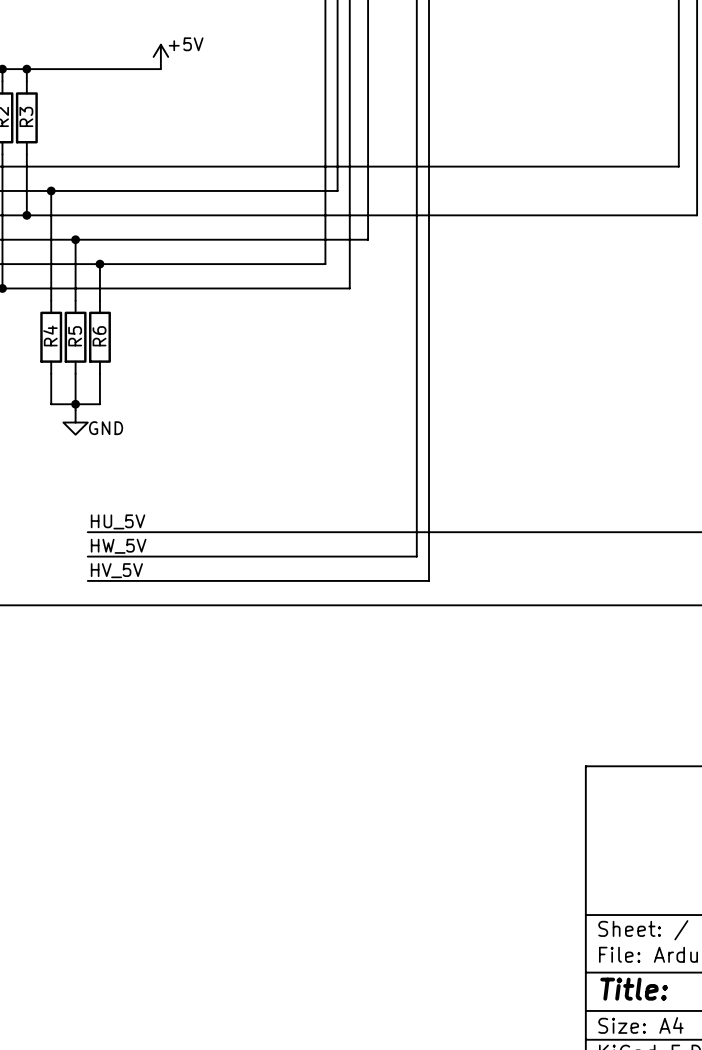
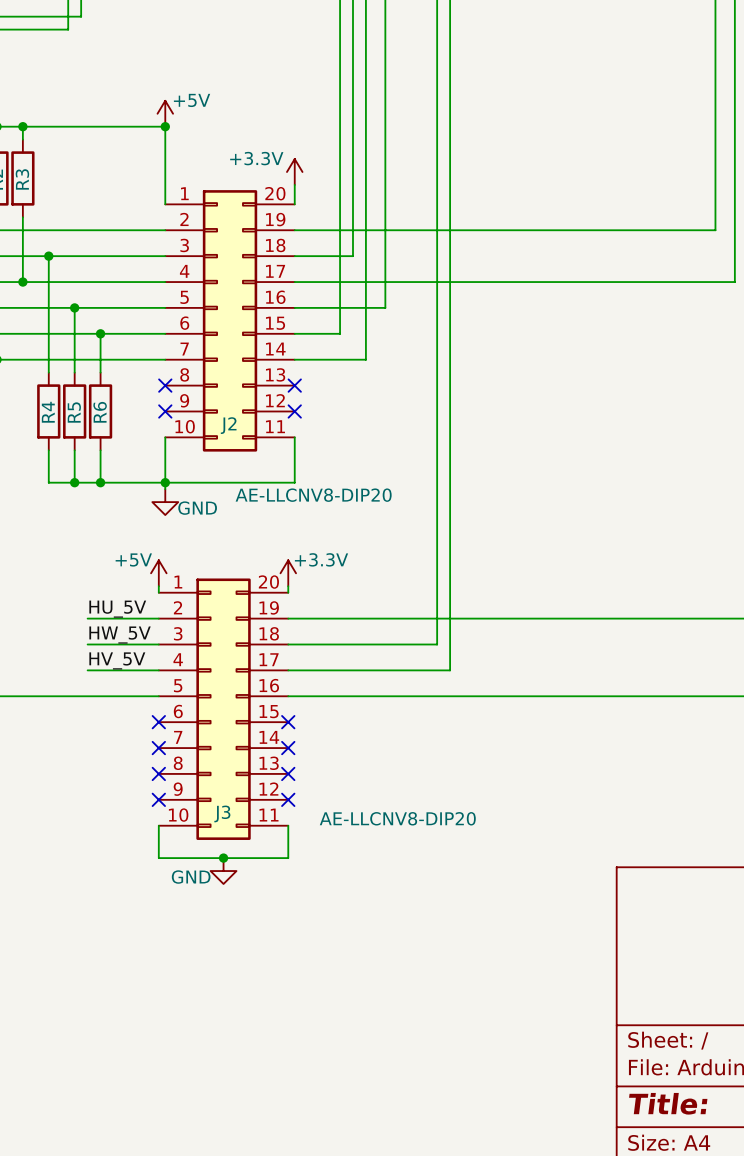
wire: none -> (165, 126) (165, 204)
junction: none -> (165, 126)
power symbol: none -> +3.3V (294, 172)
wire: none -> (294, 184) (294, 204)
J2: none -> AE-LLCNV8-DIP20 (230, 320)
no-connect mark: none -> (165, 385)
no-connect mark: none -> (294, 385)
no-connect mark: none -> (165, 411)
no-connect mark: none -> (294, 411)
wire: none -> (165, 437) (165, 489)
wire: none -> (294, 437) (294, 482) (100, 482)
junction: none -> (100, 482)
junction: none -> (165, 482)
power symbol position: GND (75, 422) -> GND (165, 502)
power symbol: none -> +5V (158, 573)
power symbol: none -> +3.3V (288, 573)
wire: none -> (288, 586) (288, 592)
J3: none -> AE-LLCNV8-DIP20 (223, 709)
no-connect mark: none -> (158, 722)
no-connect mark: none -> (288, 722)
no-connect mark: none -> (158, 748)
no-connect mark: none -> (288, 748)
no-connect mark: none -> (158, 773)
no-connect mark: none -> (288, 773)
no-connect mark: none -> (158, 799)
no-connect mark: none -> (288, 799)
wire: none -> (158, 825) (158, 858) (288, 858) (288, 825)
junction: none -> (223, 858)
power symbol: none -> GND (223, 871)

